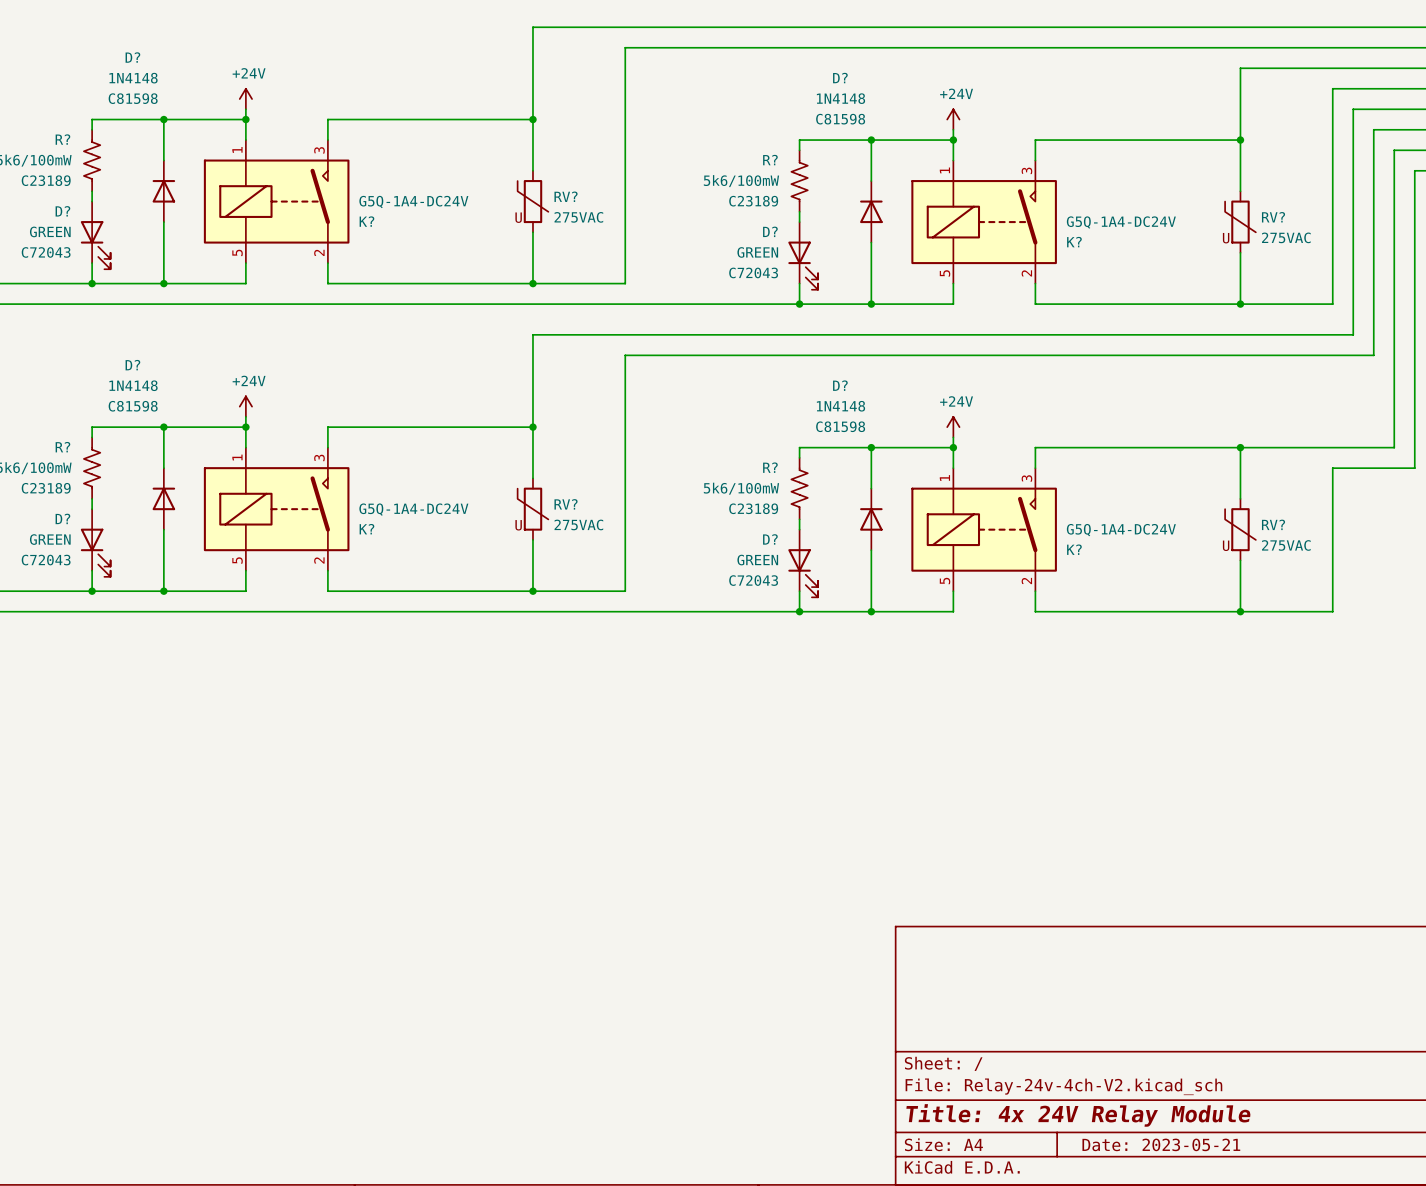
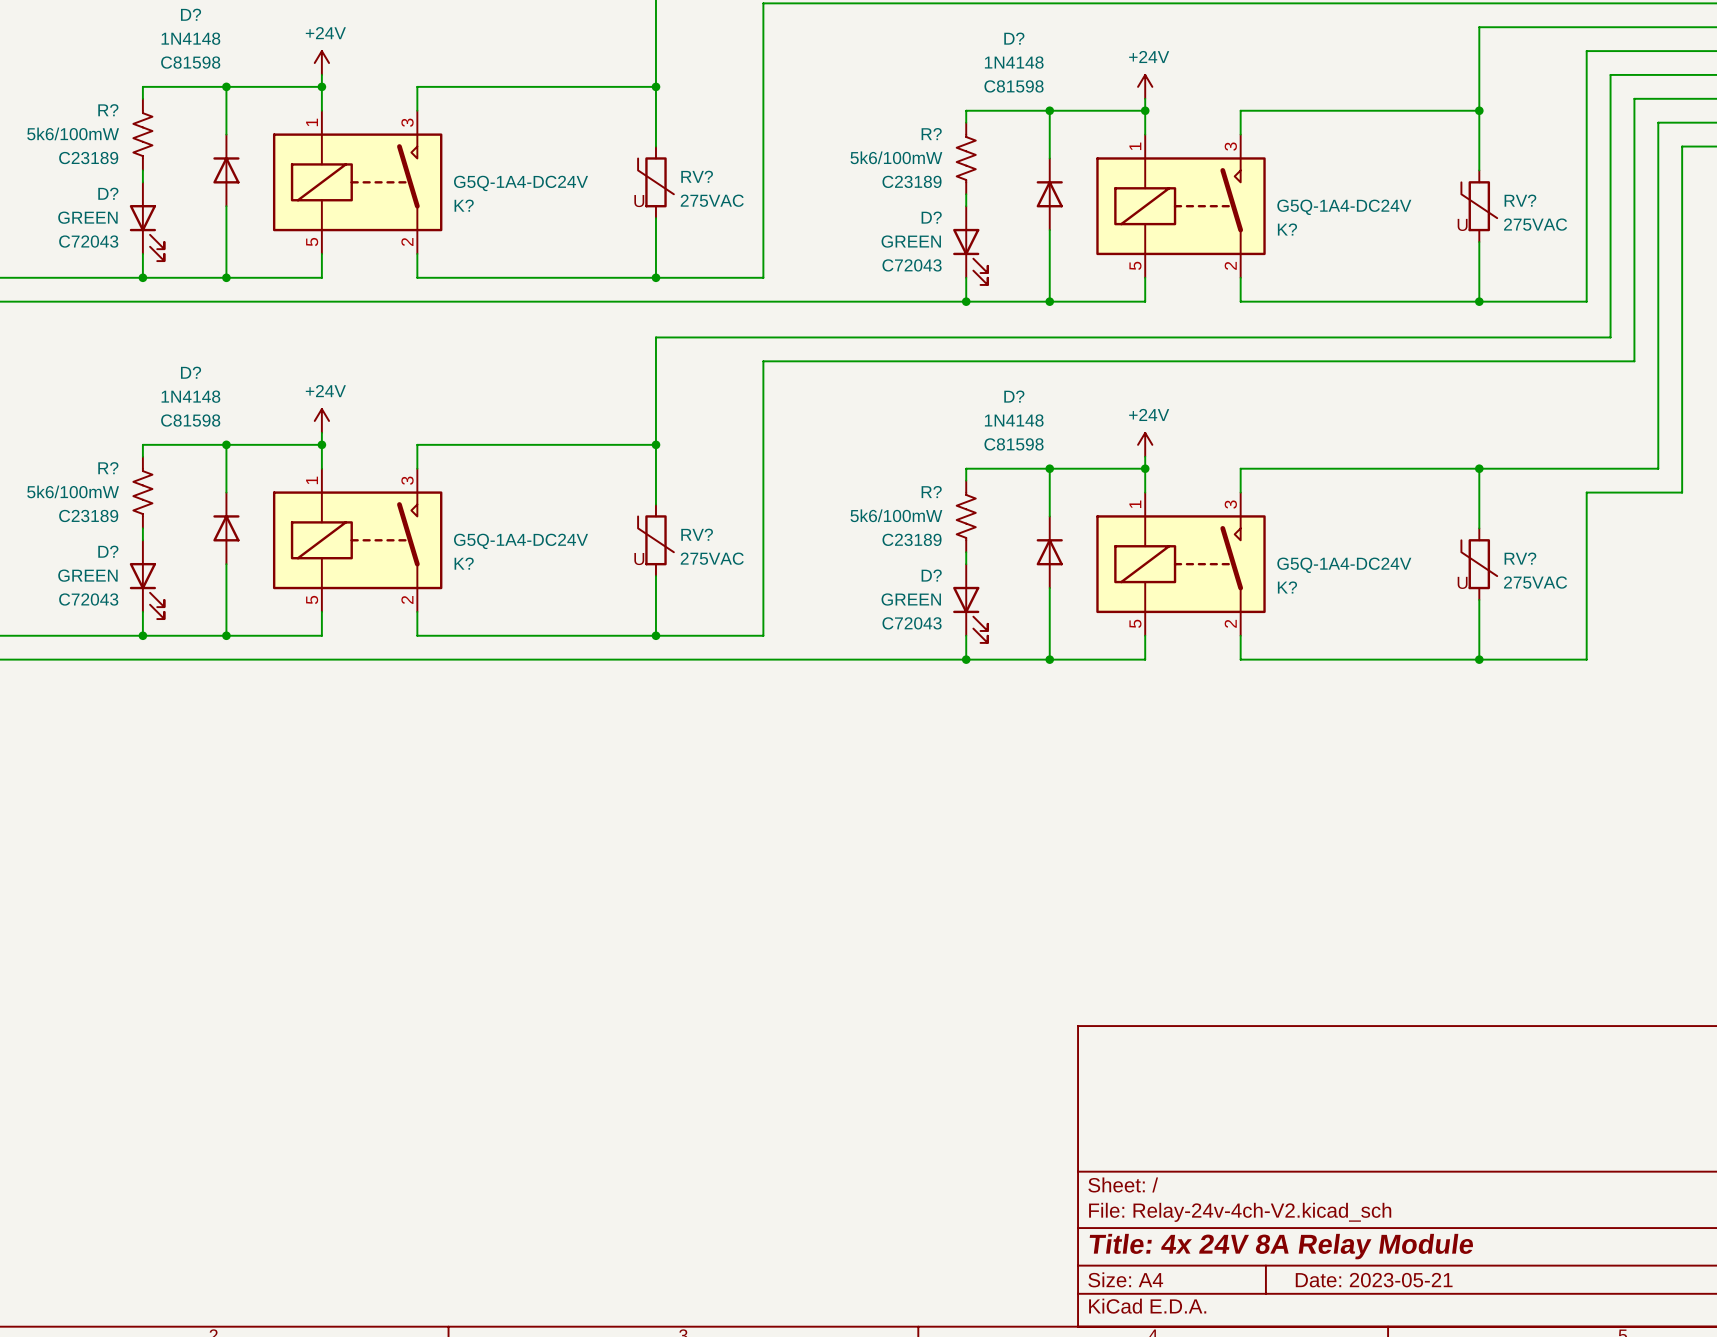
title block: Title: 4x 24V Relay Module (1078, 1115) -> Title: 4x 24V 8A Relay Module (1281, 1246)

